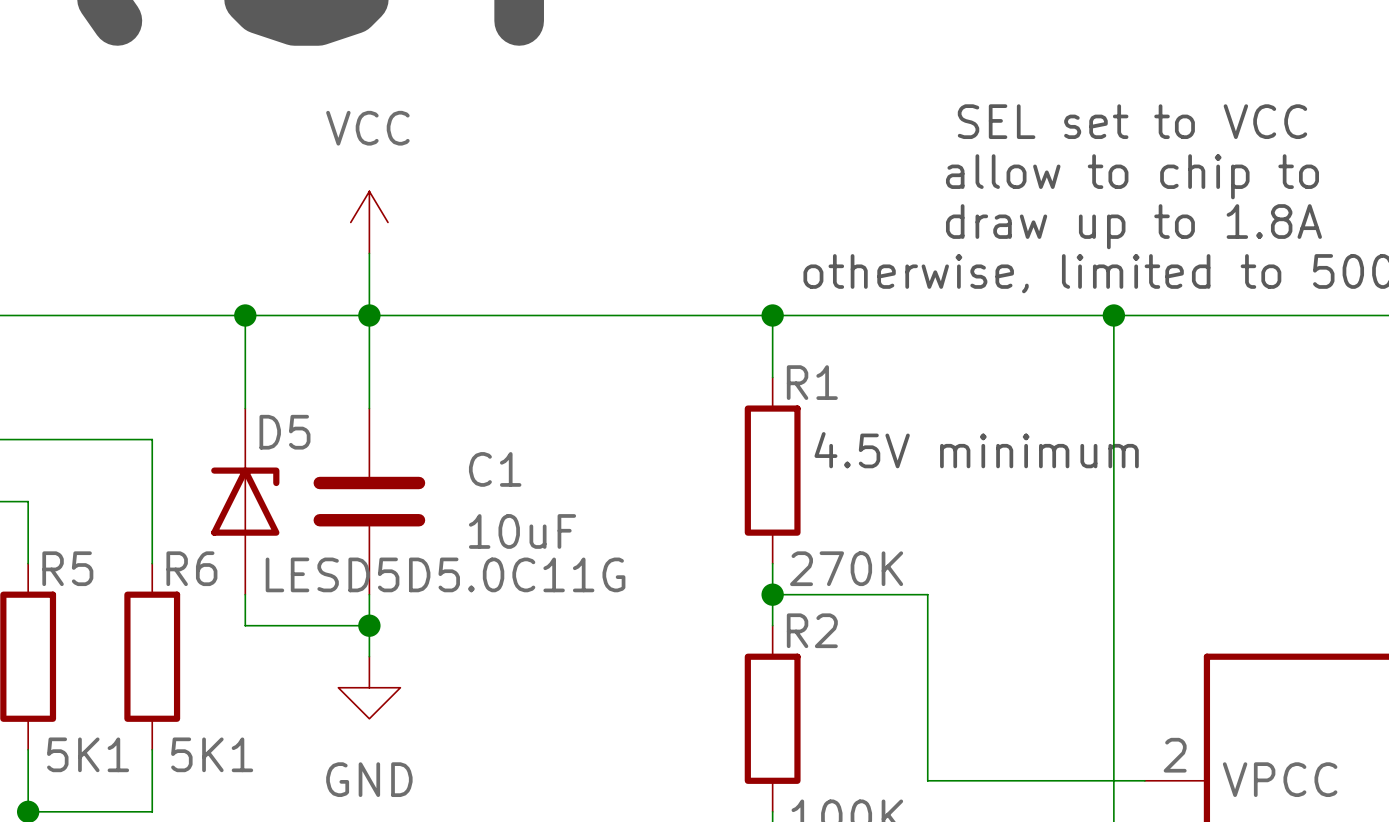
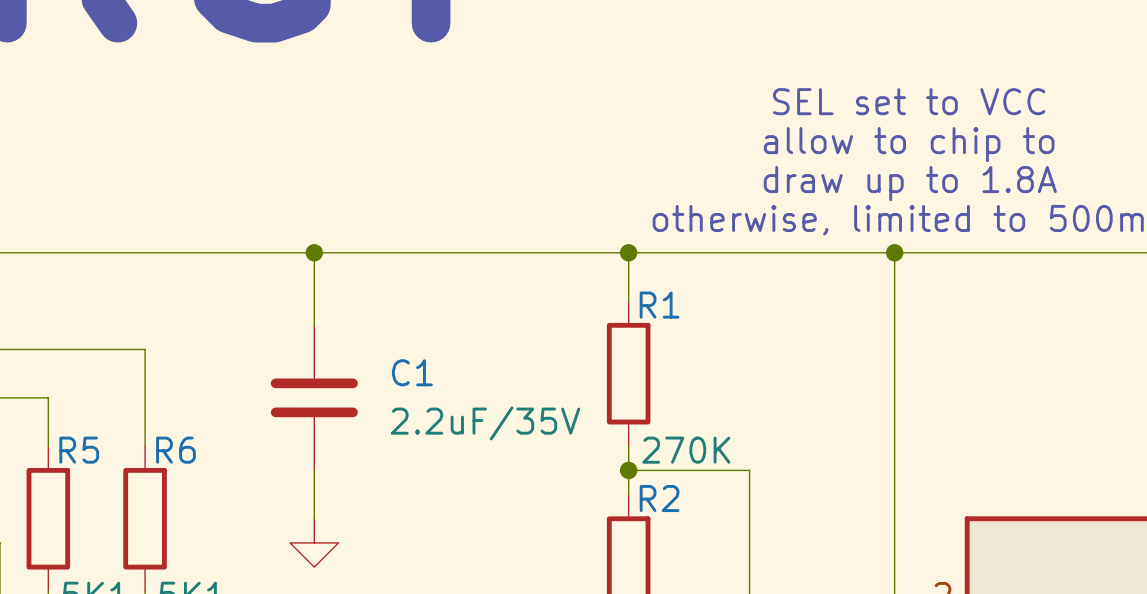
power symbol: VCC (369, 222) -> none
wire: (369, 253) (369, 315) -> none
wire: (245, 315) (245, 408) -> none
junction: (245, 315) -> none
text: 4.5V minimum (976, 450) -> none
D5: LESD5D5.0C11G (245, 501) -> none
C1 value: 10uF (522, 531) -> 2.2uF/35V (485, 423)
wire: (245, 594) (245, 625) (369, 625) -> none
junction: (369, 625) -> none

